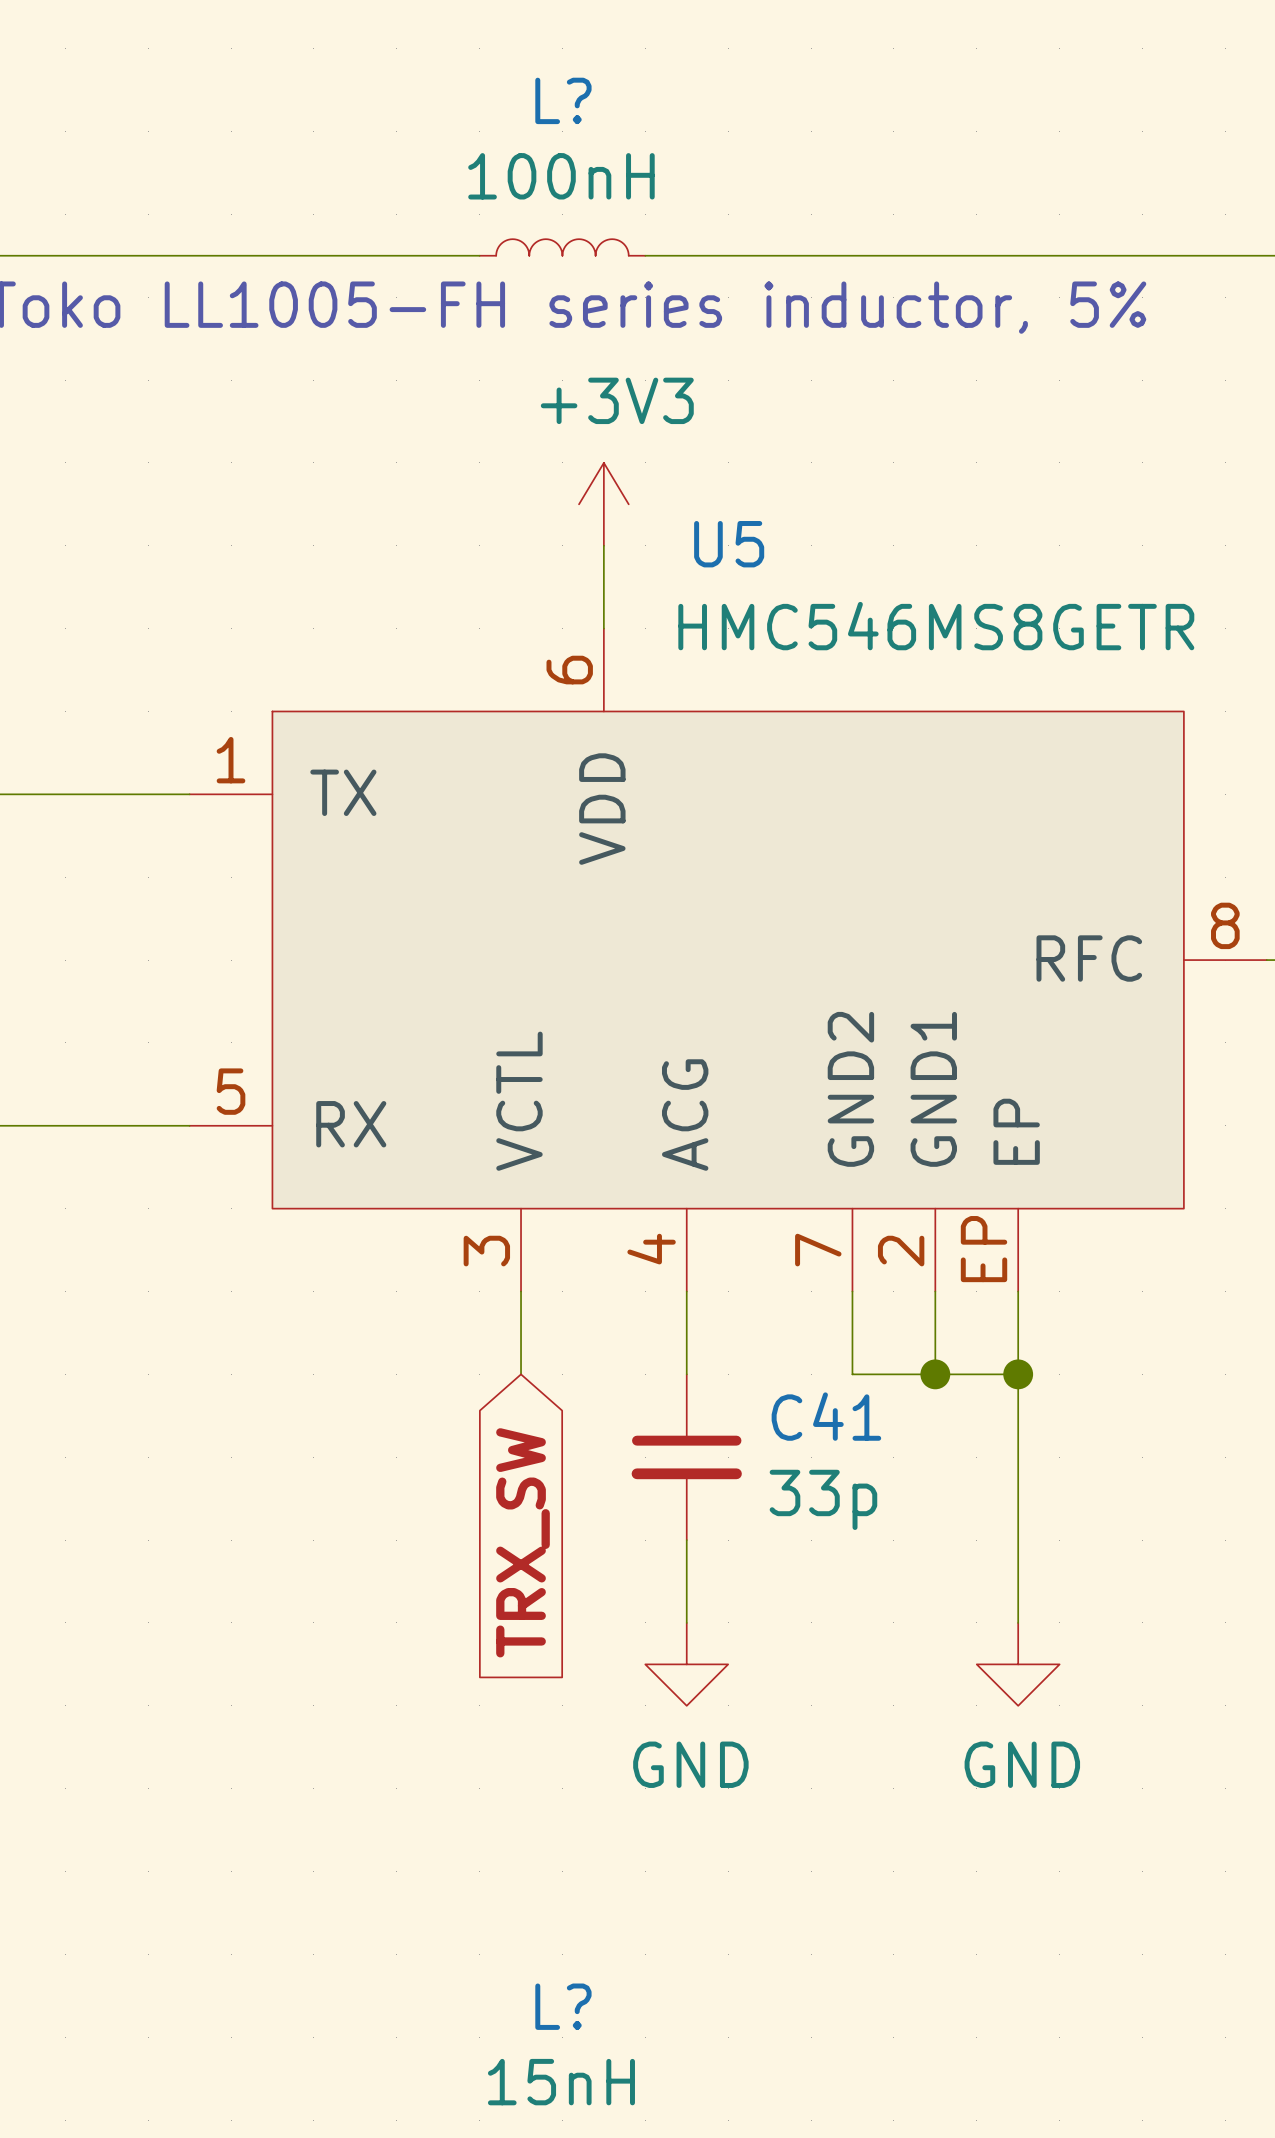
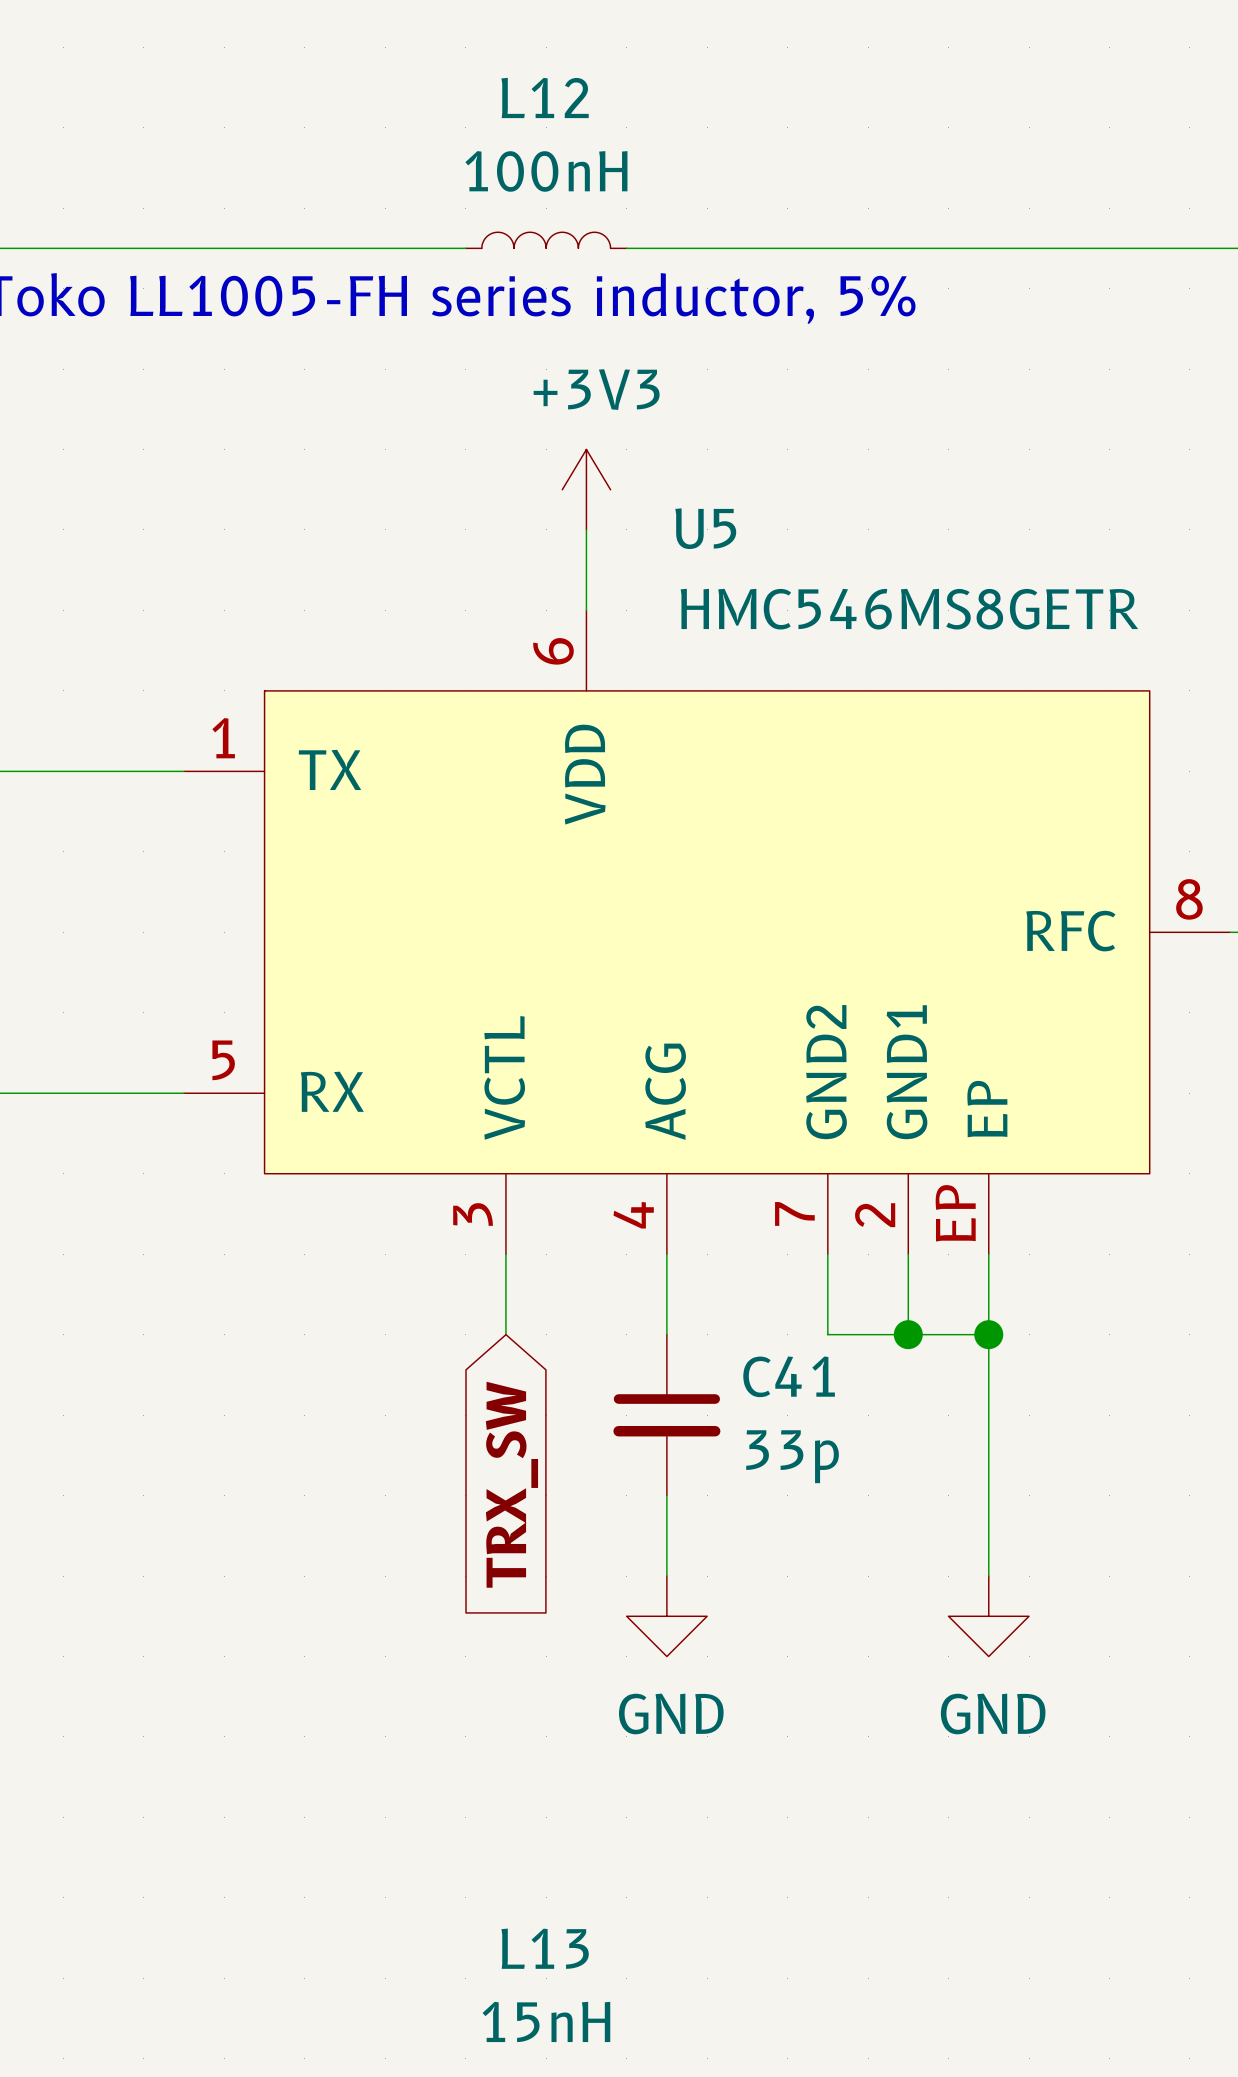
L? name: L? (563, 100) -> L12 (545, 97)
L? name: L? (563, 2006) -> L13 (545, 1948)

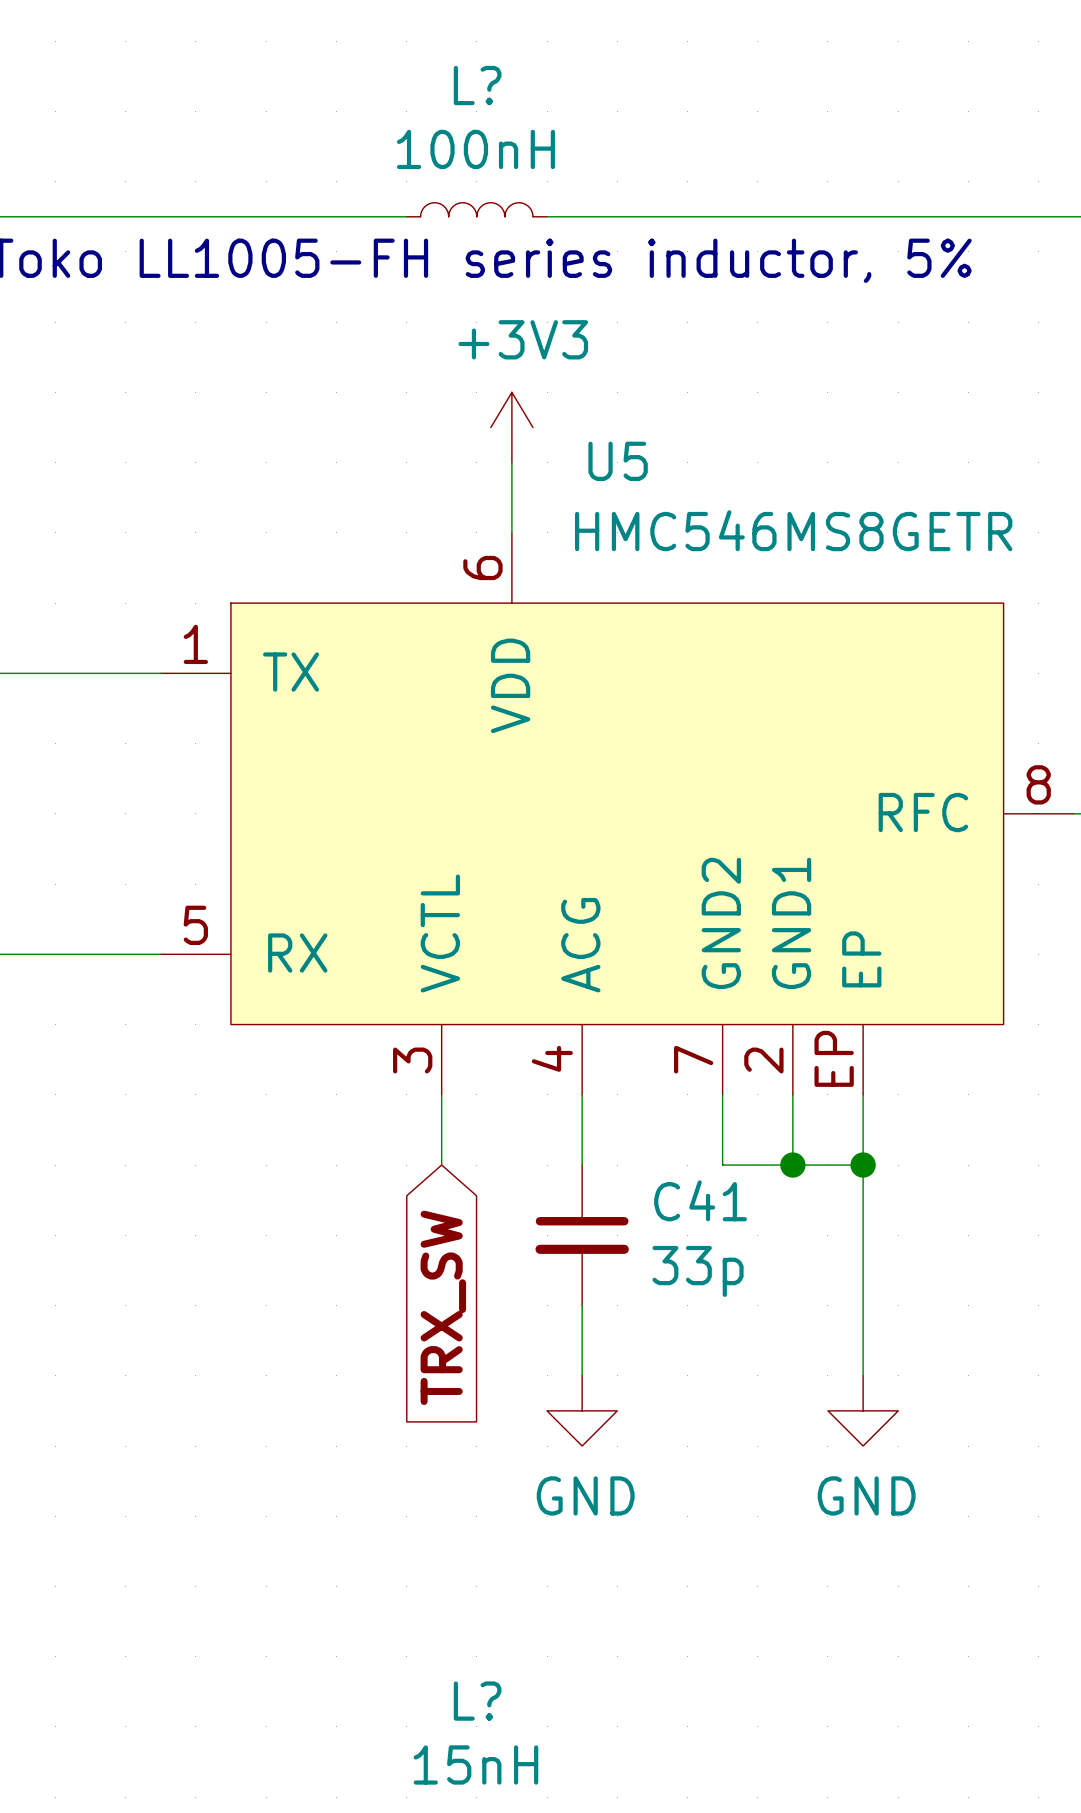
L12 name: L12 (545, 97) -> L? (477, 85)
L13 name: L13 (545, 1948) -> L? (477, 1701)

